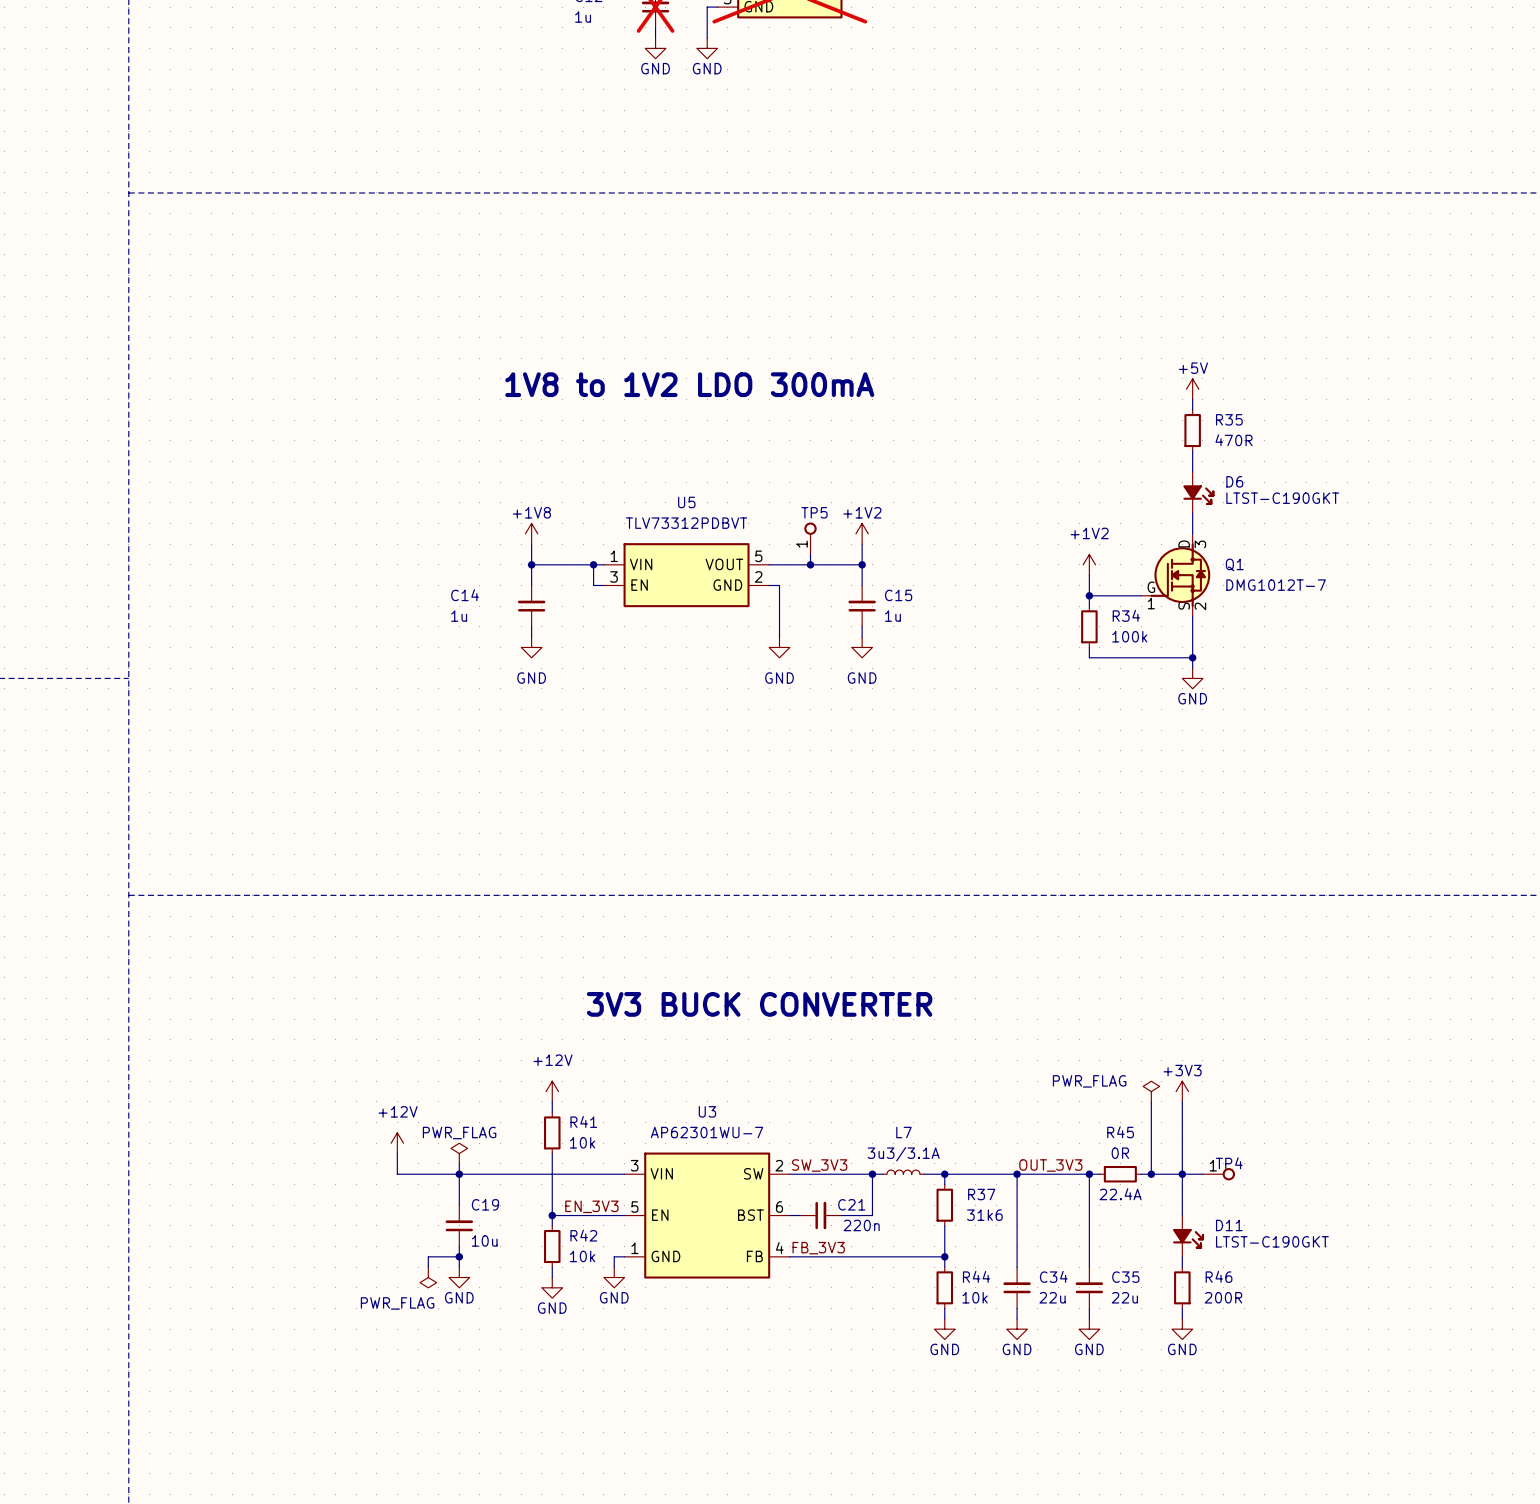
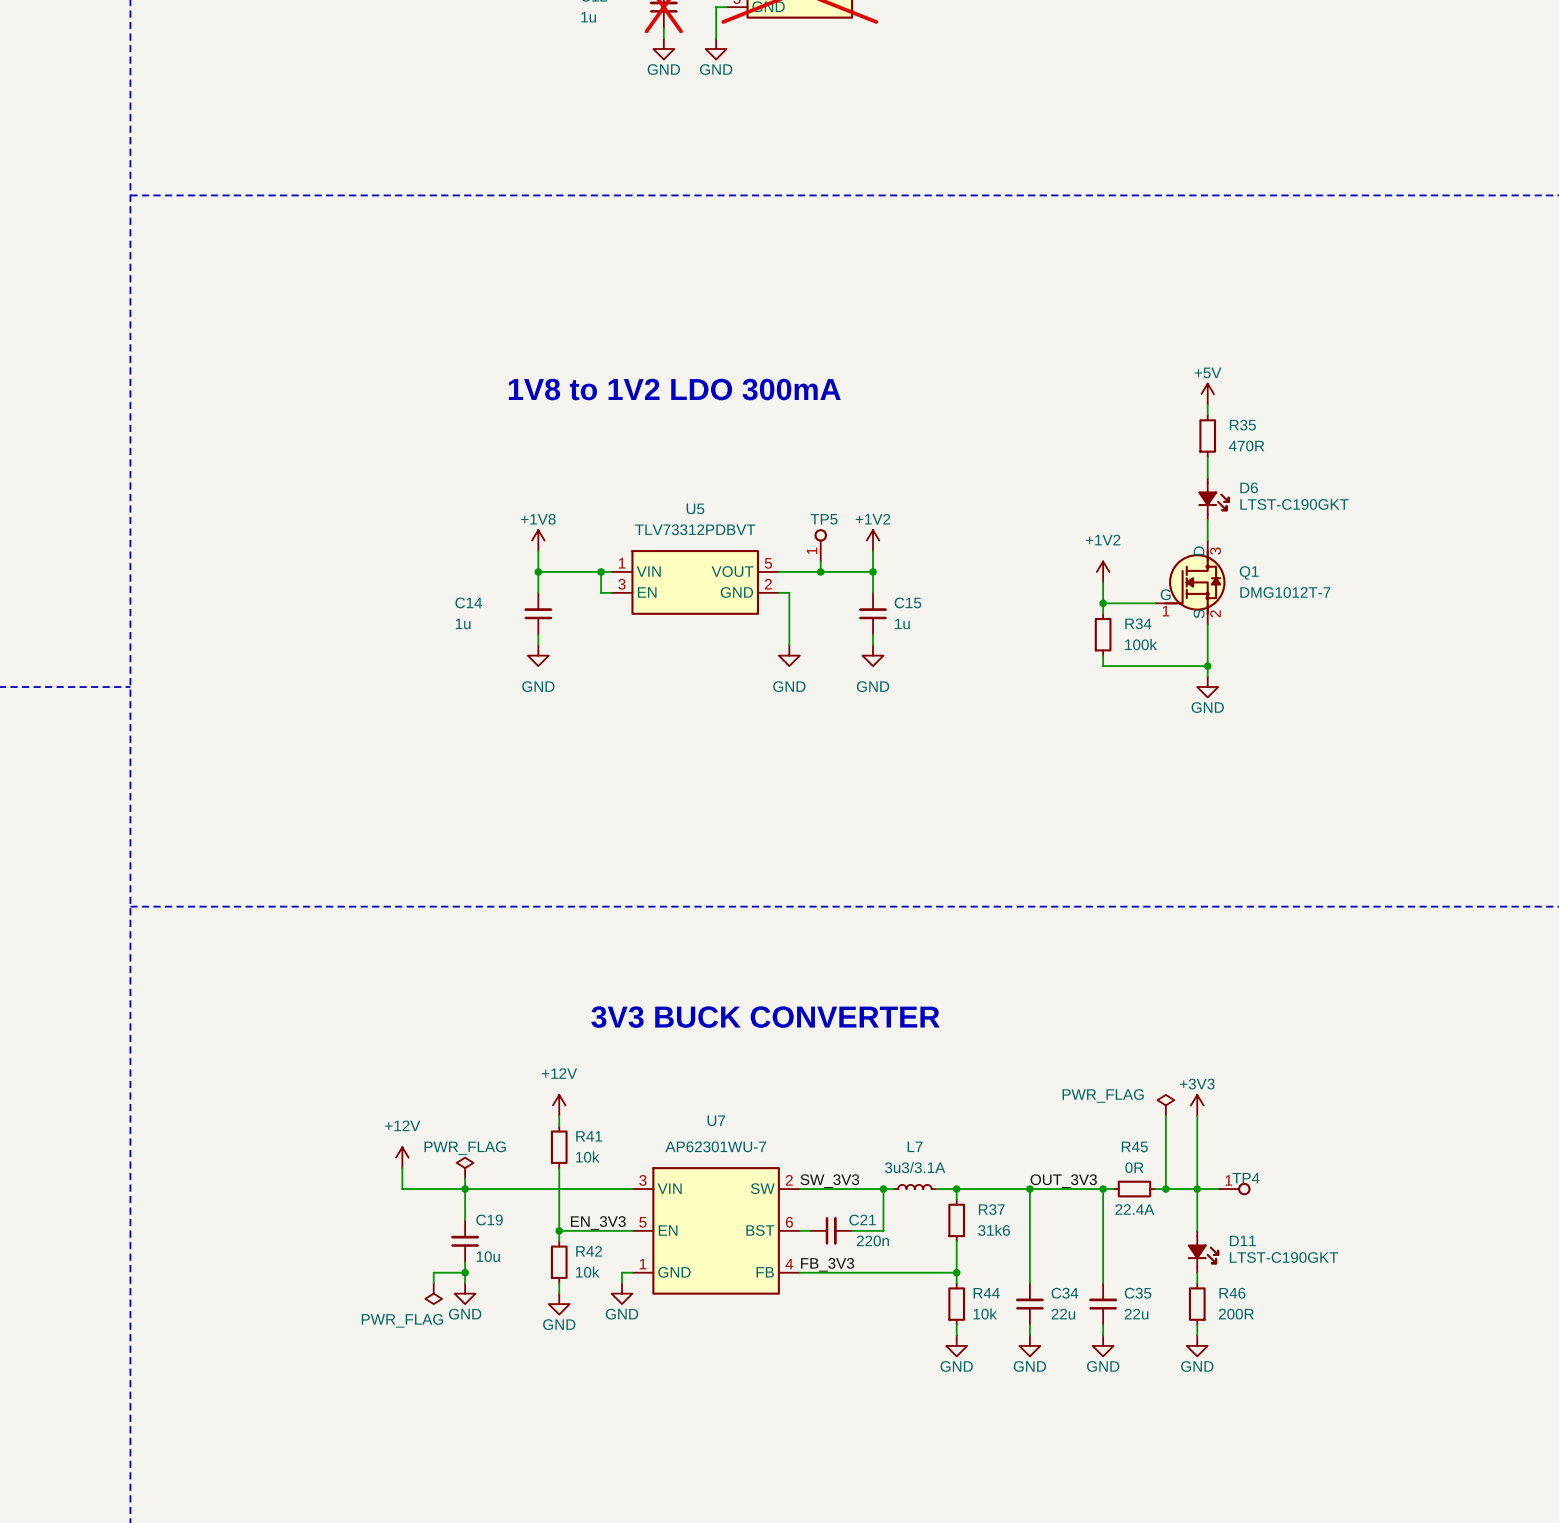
U3 name: U3 (707, 1111) -> U7 (716, 1120)

